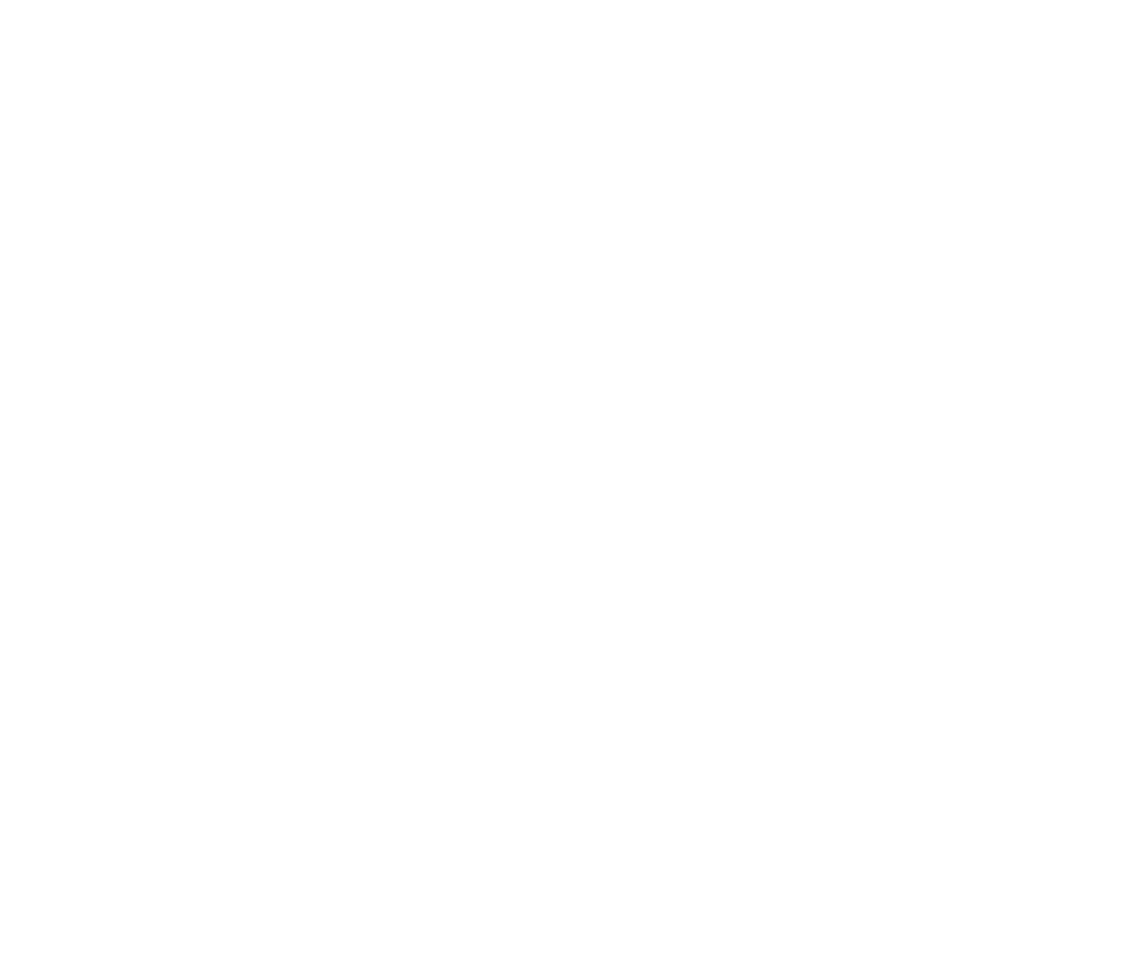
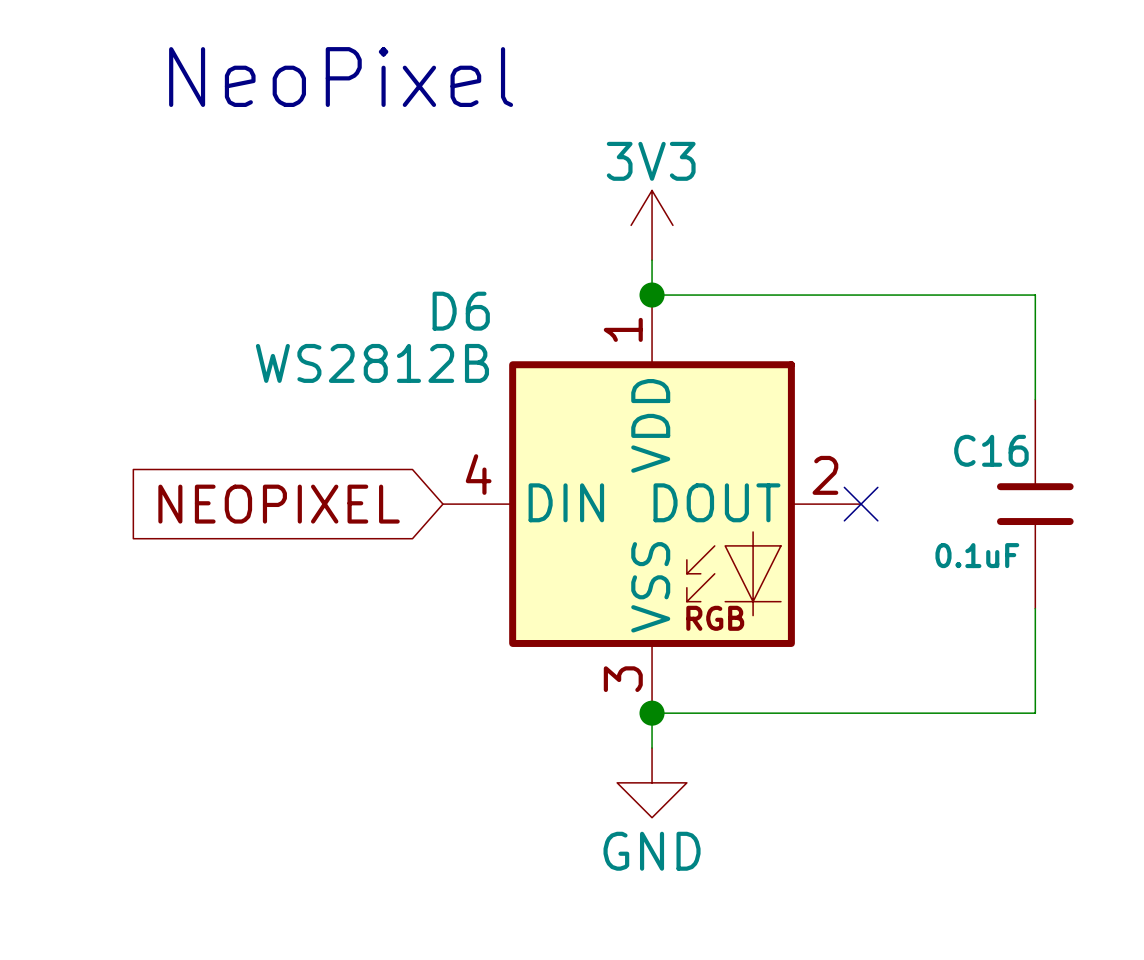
text: none -> NeoPixel (341, 77)
power symbol: none -> 3V3 (652, 225)
wire: none -> (652, 260) (652, 295) (1035, 295) (1035, 399)
junction: none -> (652, 295)
global label: none -> NEOPIXEL (279, 504)
D6: none -> WS2812B (652, 504)
no-connect mark: none -> (861, 504)
C16: none -> 0.1uF (1035, 504)
wire: none -> (1035, 608) (1035, 713) (652, 713) (652, 748)
junction: none -> (652, 713)
power symbol: none -> GND (652, 782)

